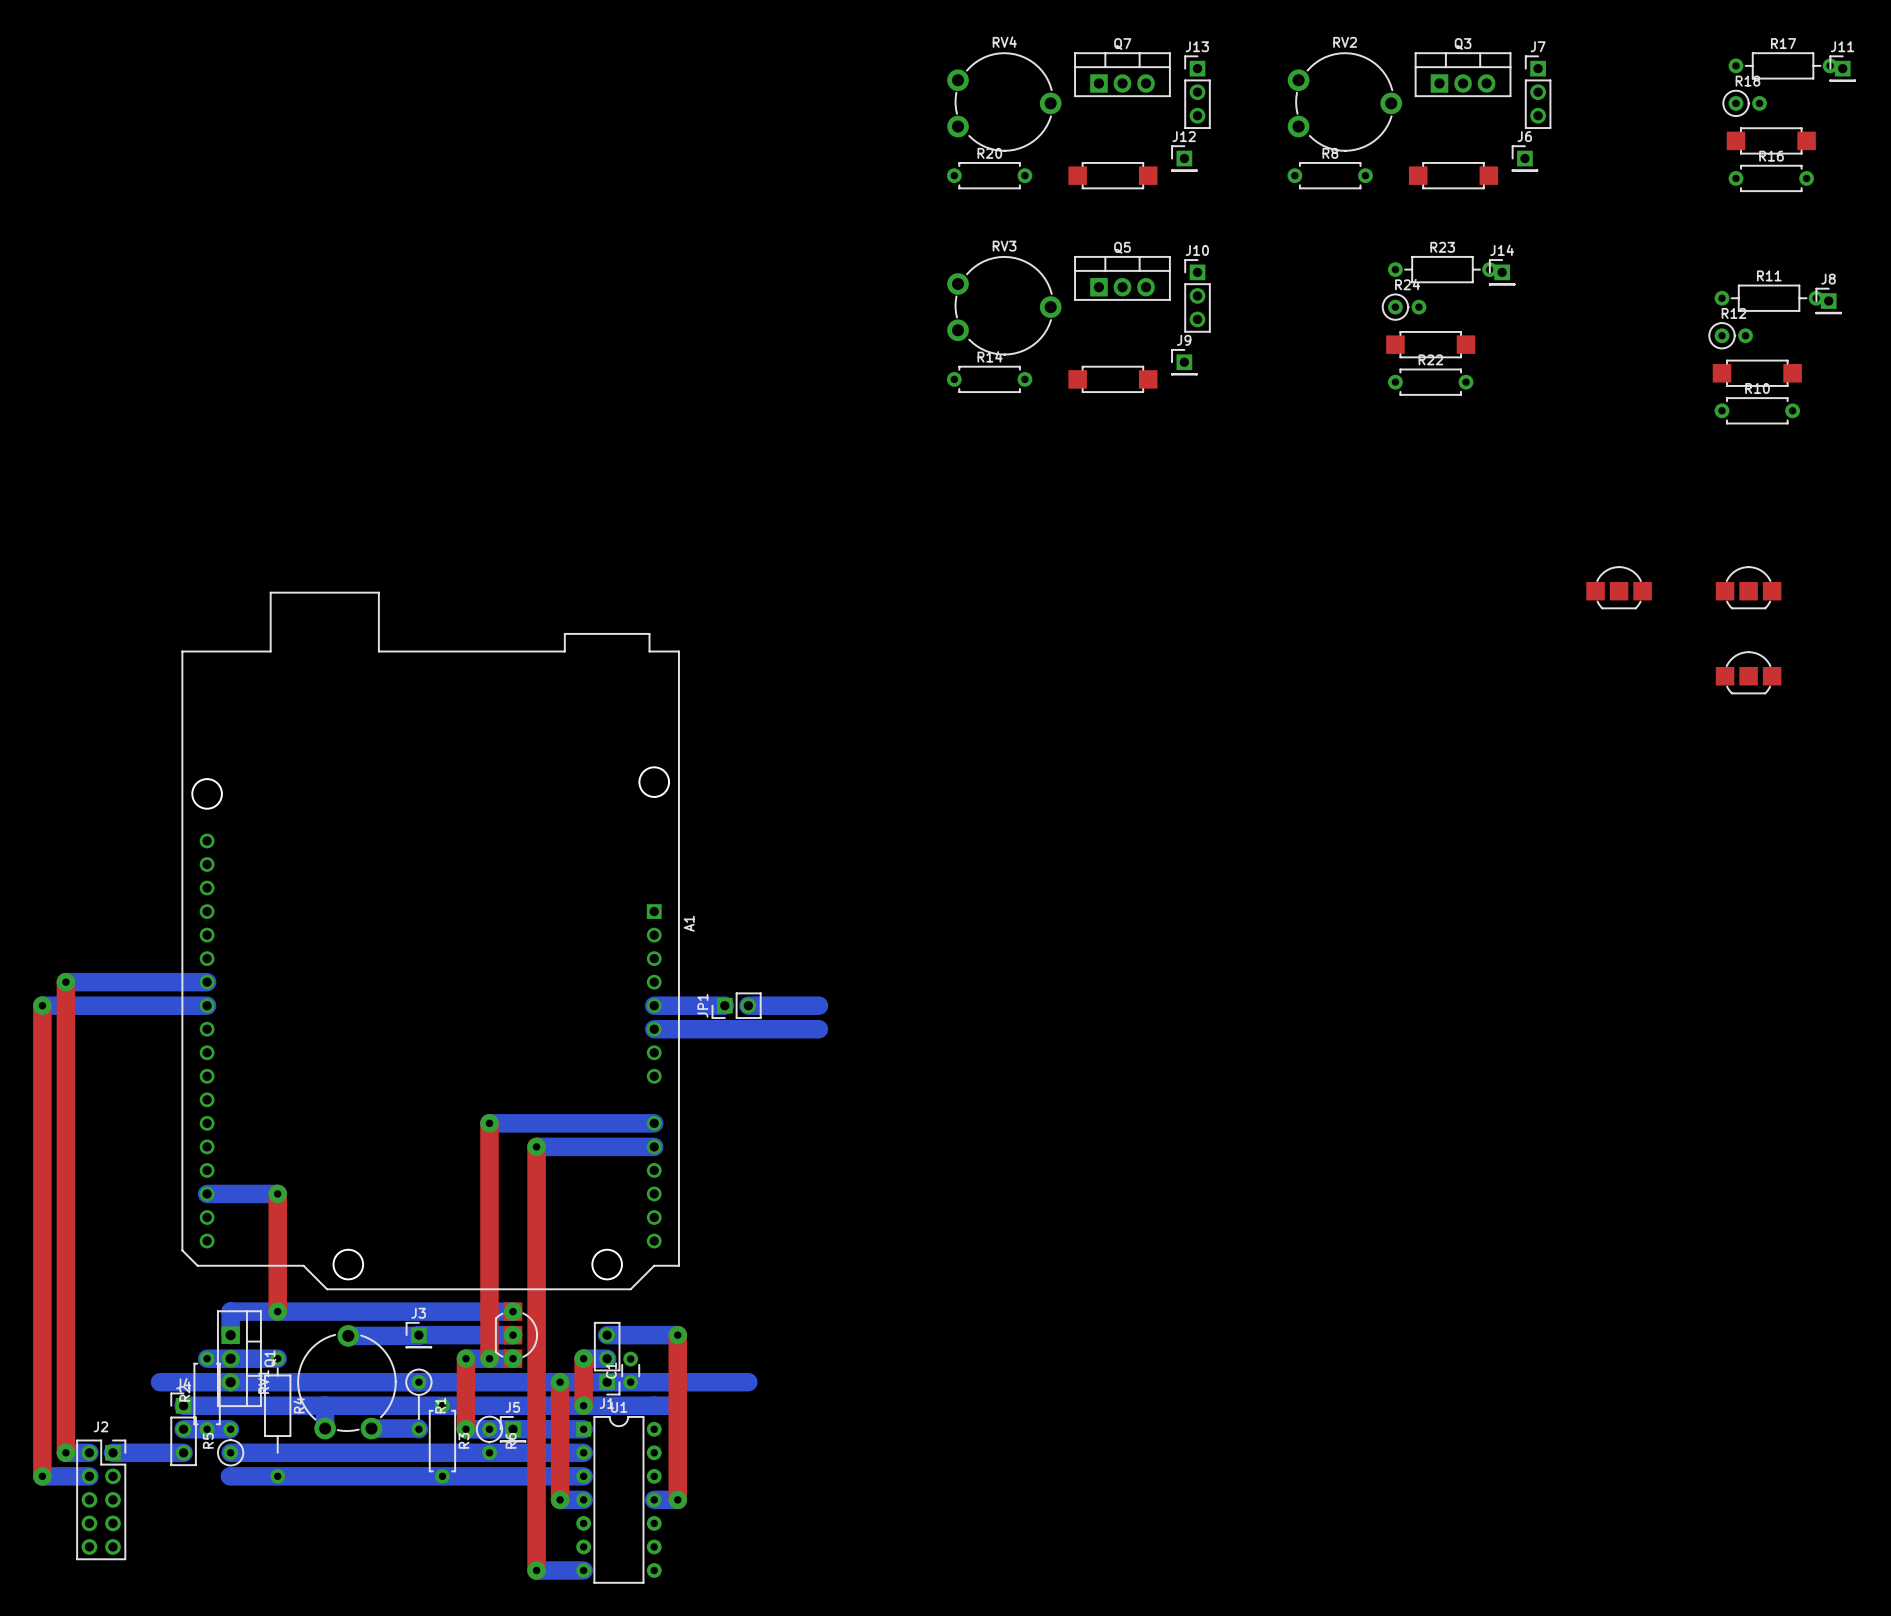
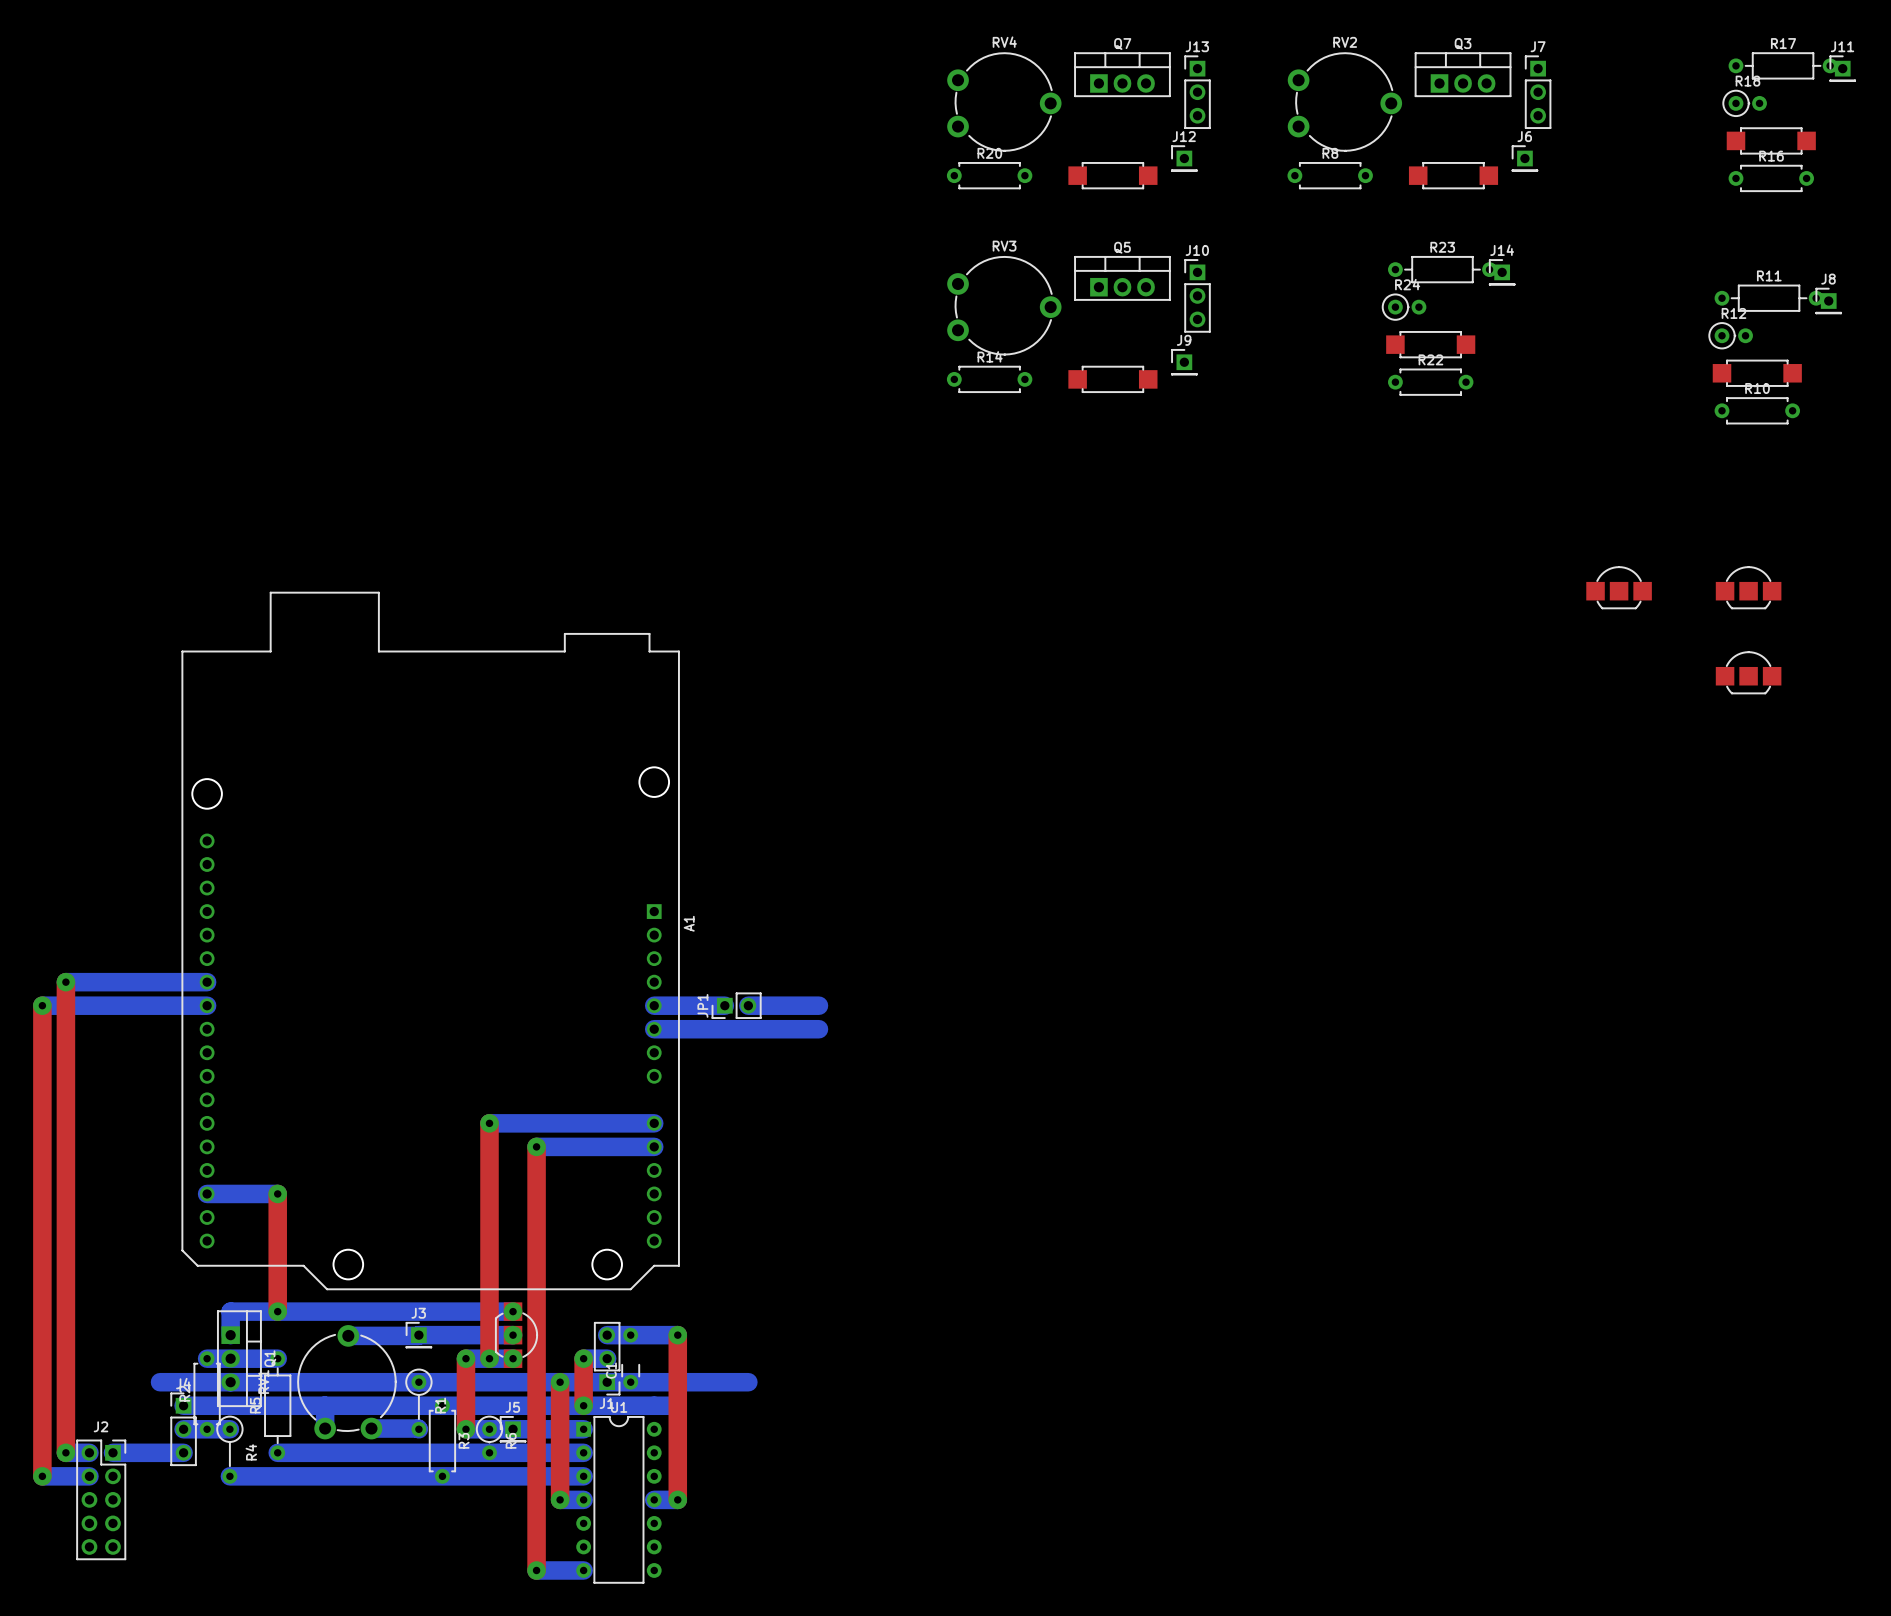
R4 footprint: [264, 1351, 291, 1484] -> [216, 1416, 244, 1484]
C1 footprint: [621, 1351, 640, 1390] -> [621, 1327, 640, 1390]
R5 footprint: [217, 1421, 244, 1467] -> [264, 1351, 291, 1461]
bottom track: (230, 1452) (277, 1452) -> none

